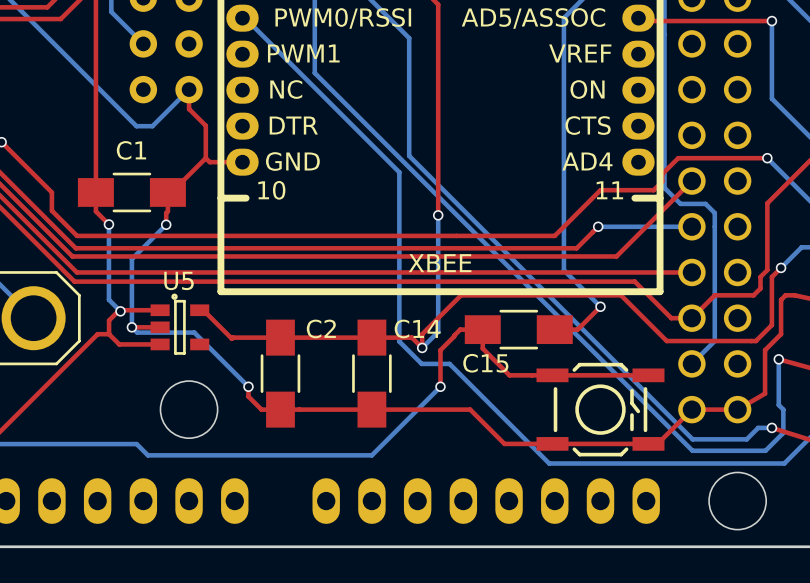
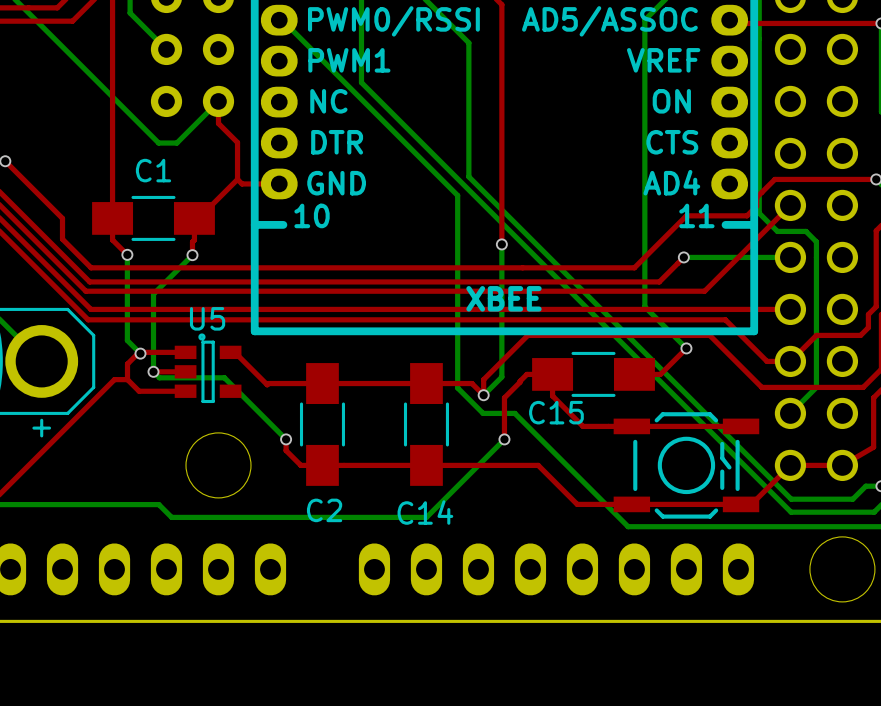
C2 name position: C2 (321, 328) -> C2 (324, 510)
C14 name position: C14 (417, 328) -> C14 (425, 512)
text: none -> + (41, 428)

